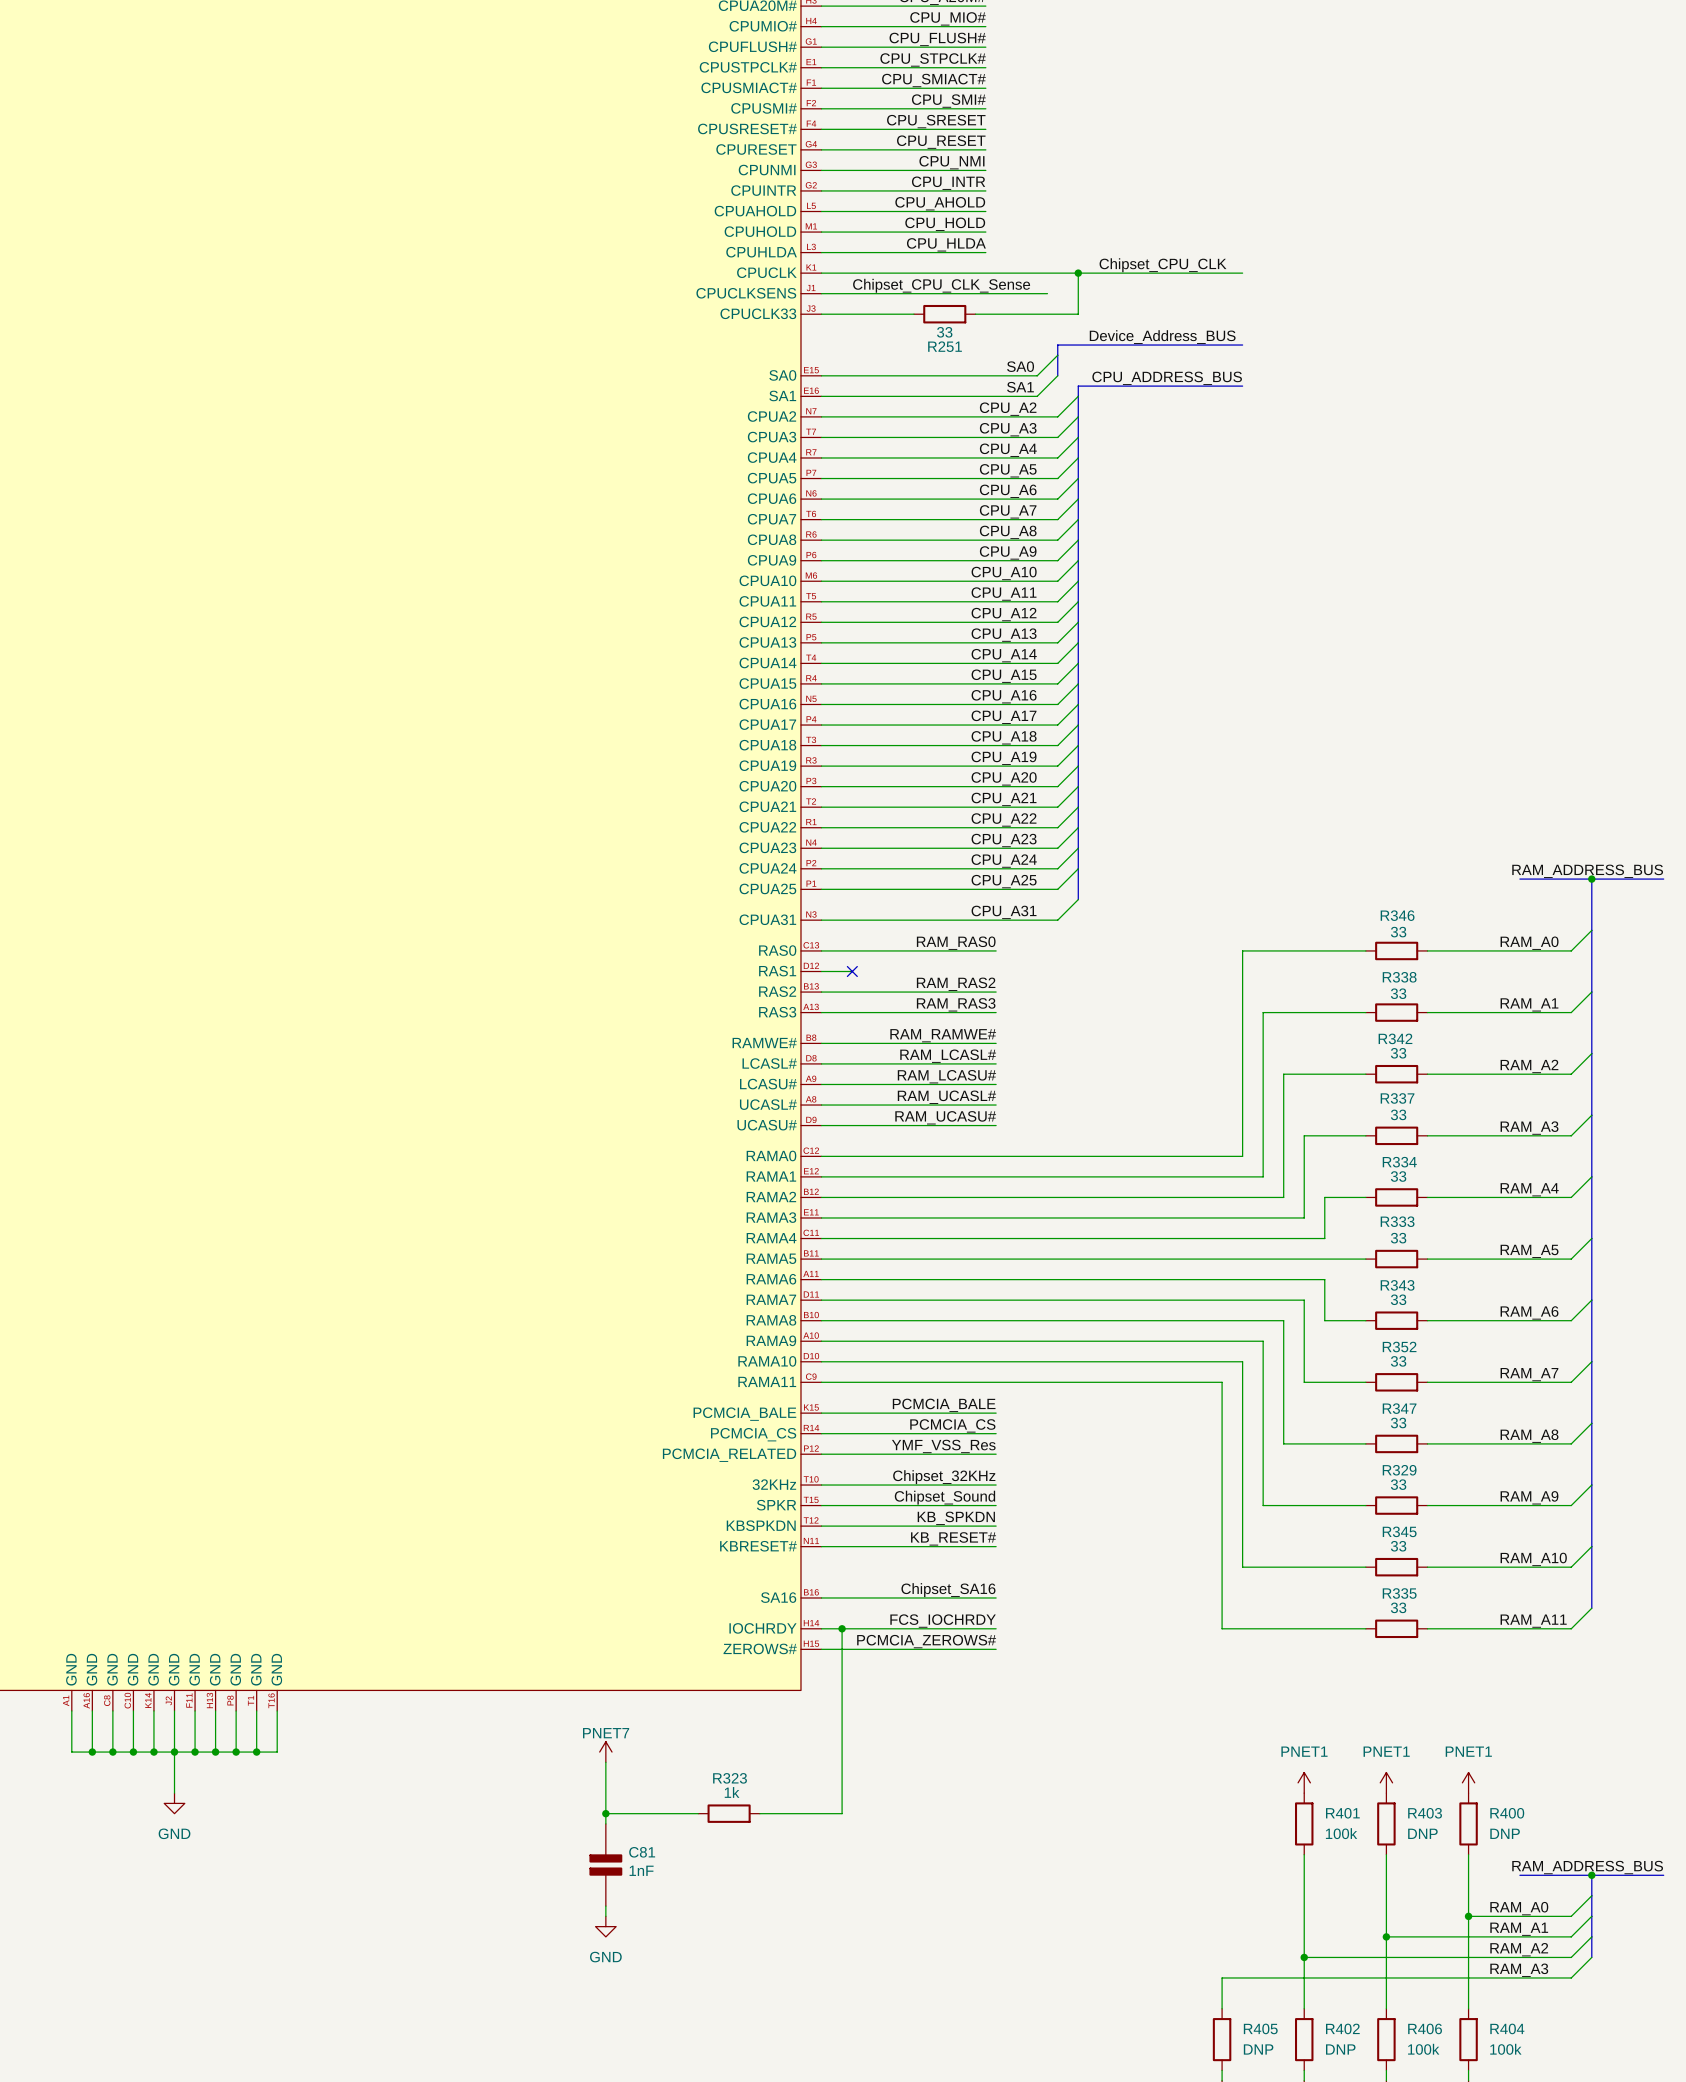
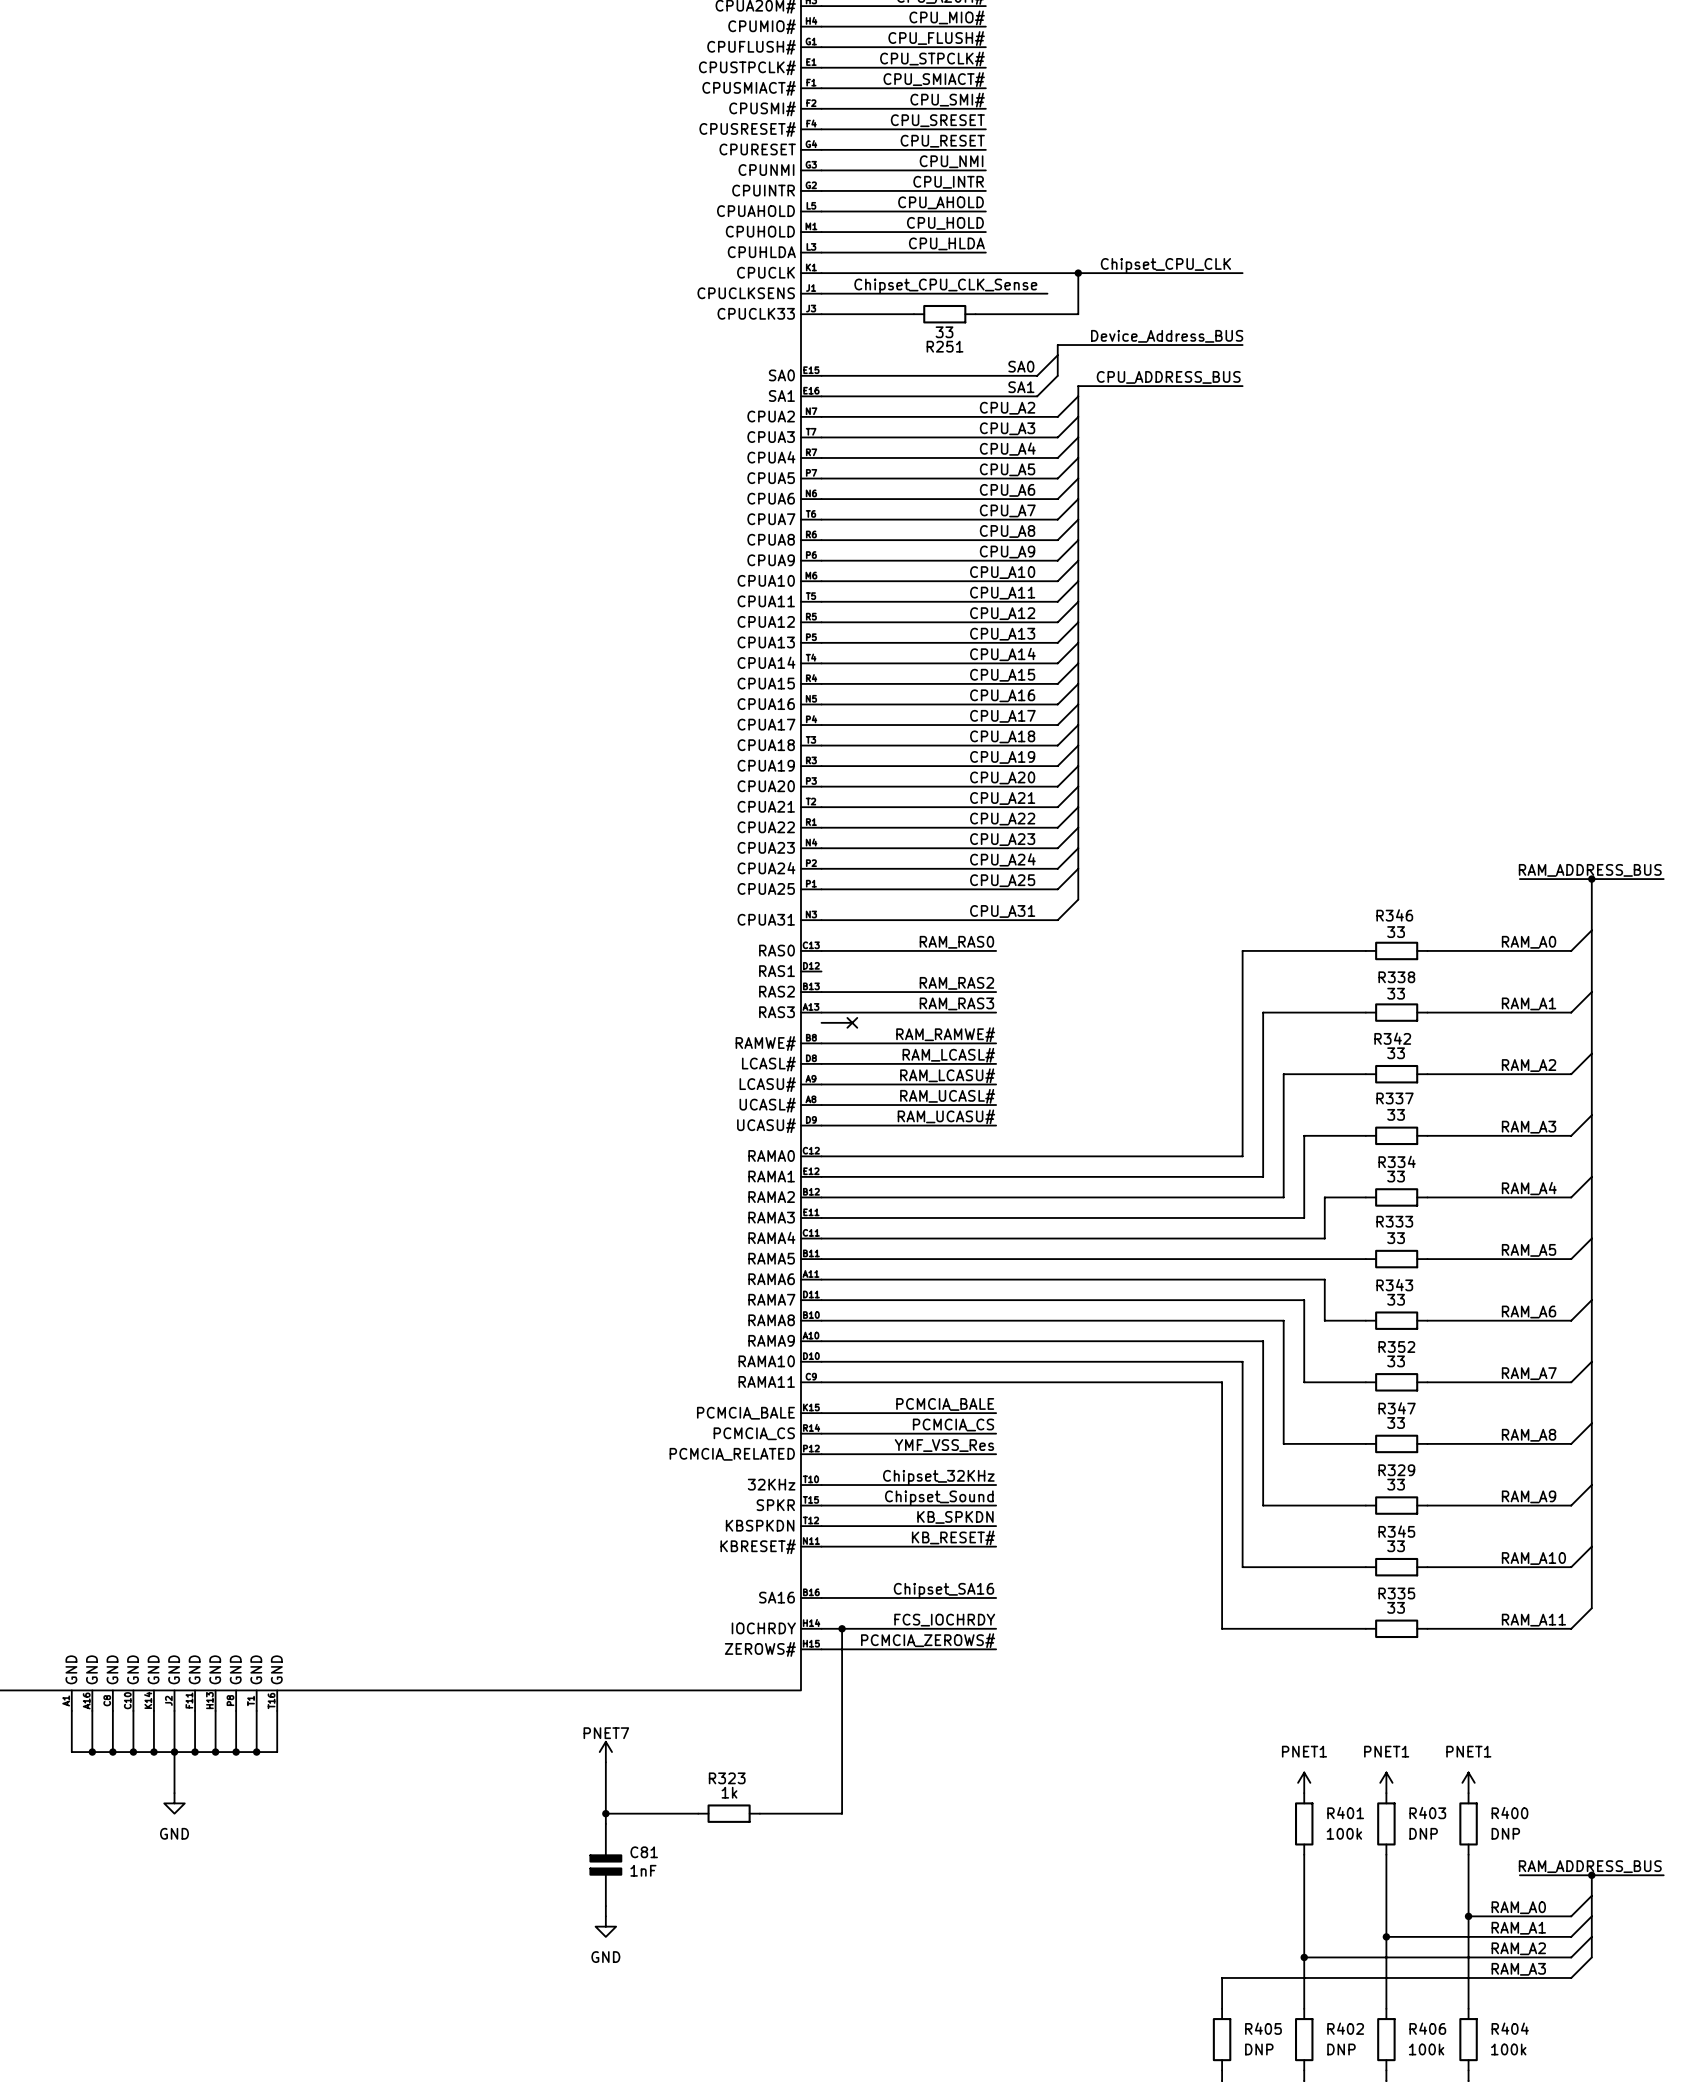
wire: (821, 971) (852, 971) -> (821, 1022) (852, 1022)
no-connect mark: (852, 971) -> none
no-connect mark: none -> (852, 1022)

